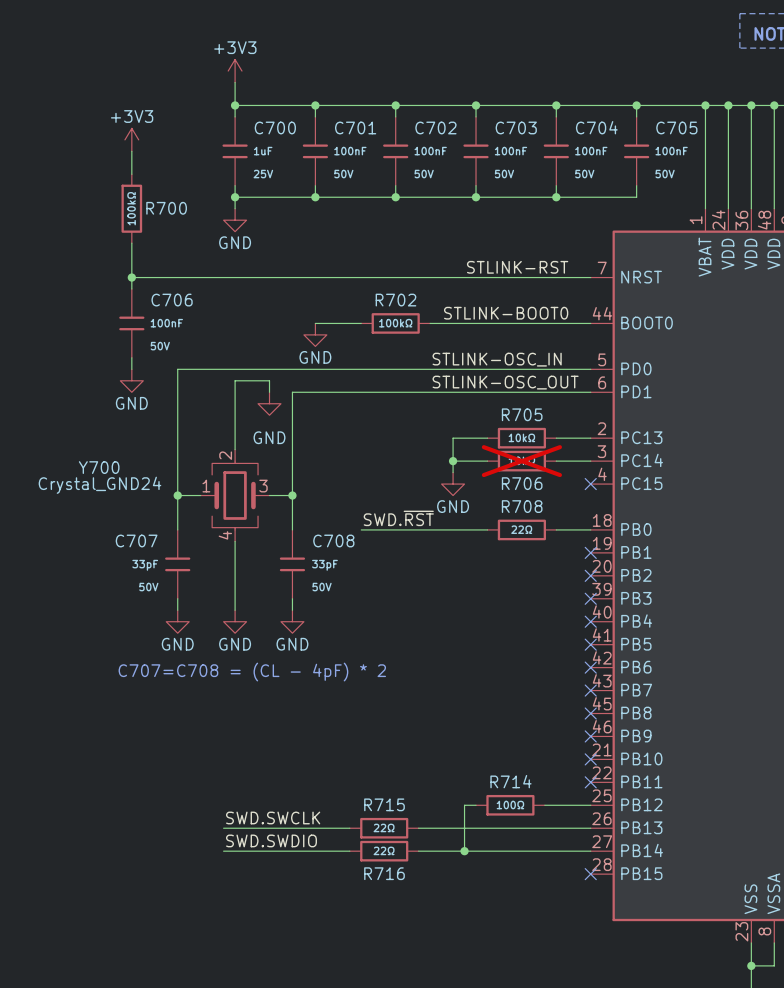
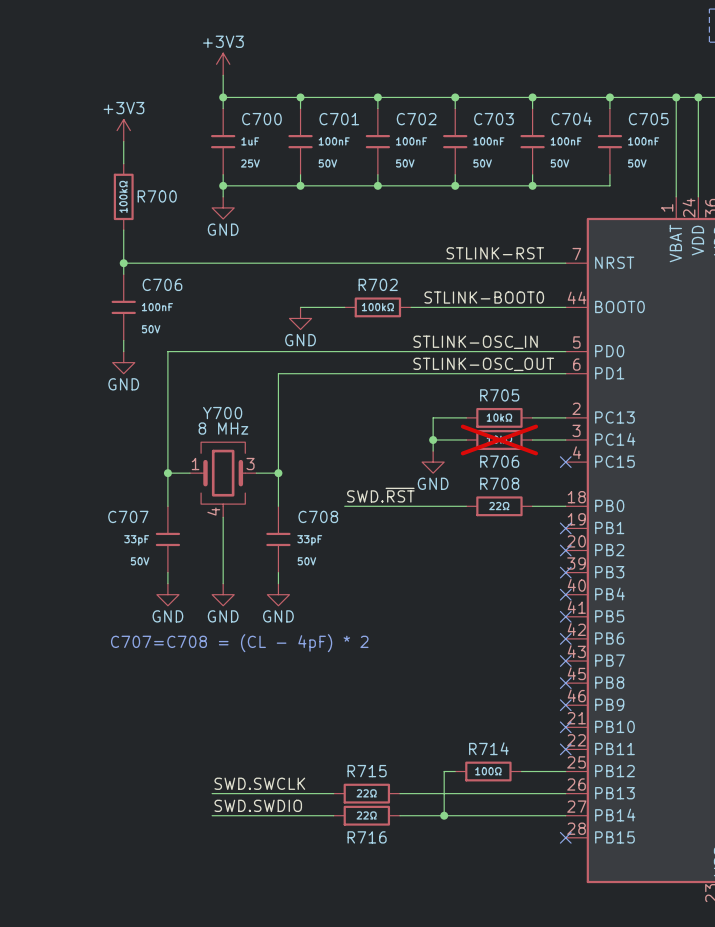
wire: (269, 392) (269, 380) (235, 380) (235, 449) -> none
power symbol: GND (269, 403) -> none
Y700 symbol: [200, 449, 270, 542] -> [190, 442, 257, 518]
Y700 name position: Y700 (99, 467) -> Y700 (222, 413)
Y700 value: Crystal_GND24 (99, 485) -> 8 MHz (223, 428)

